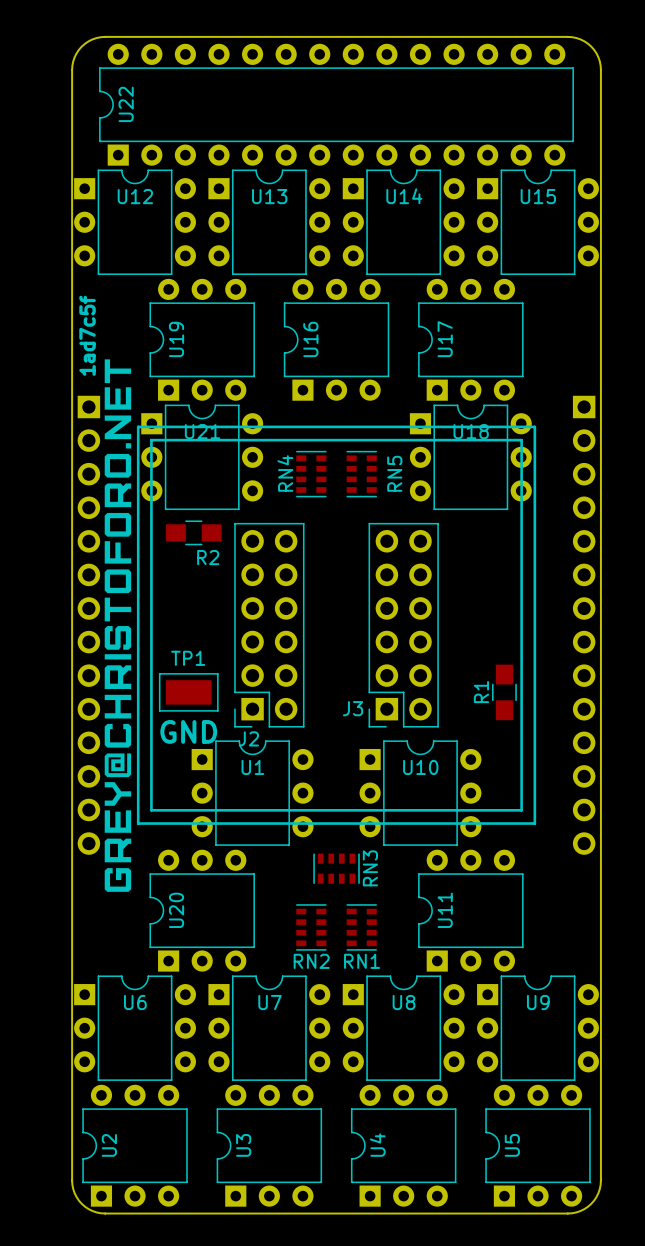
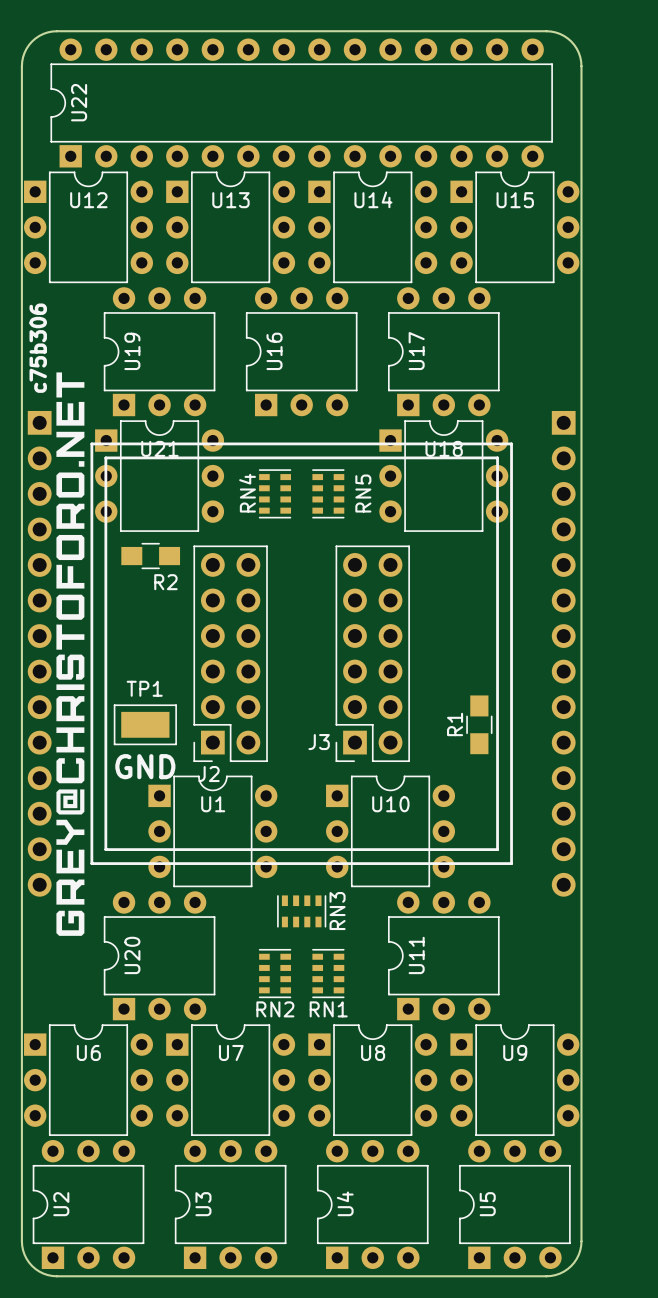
text: 1ad7c5f (87, 335) -> c75b306 (38, 348)

